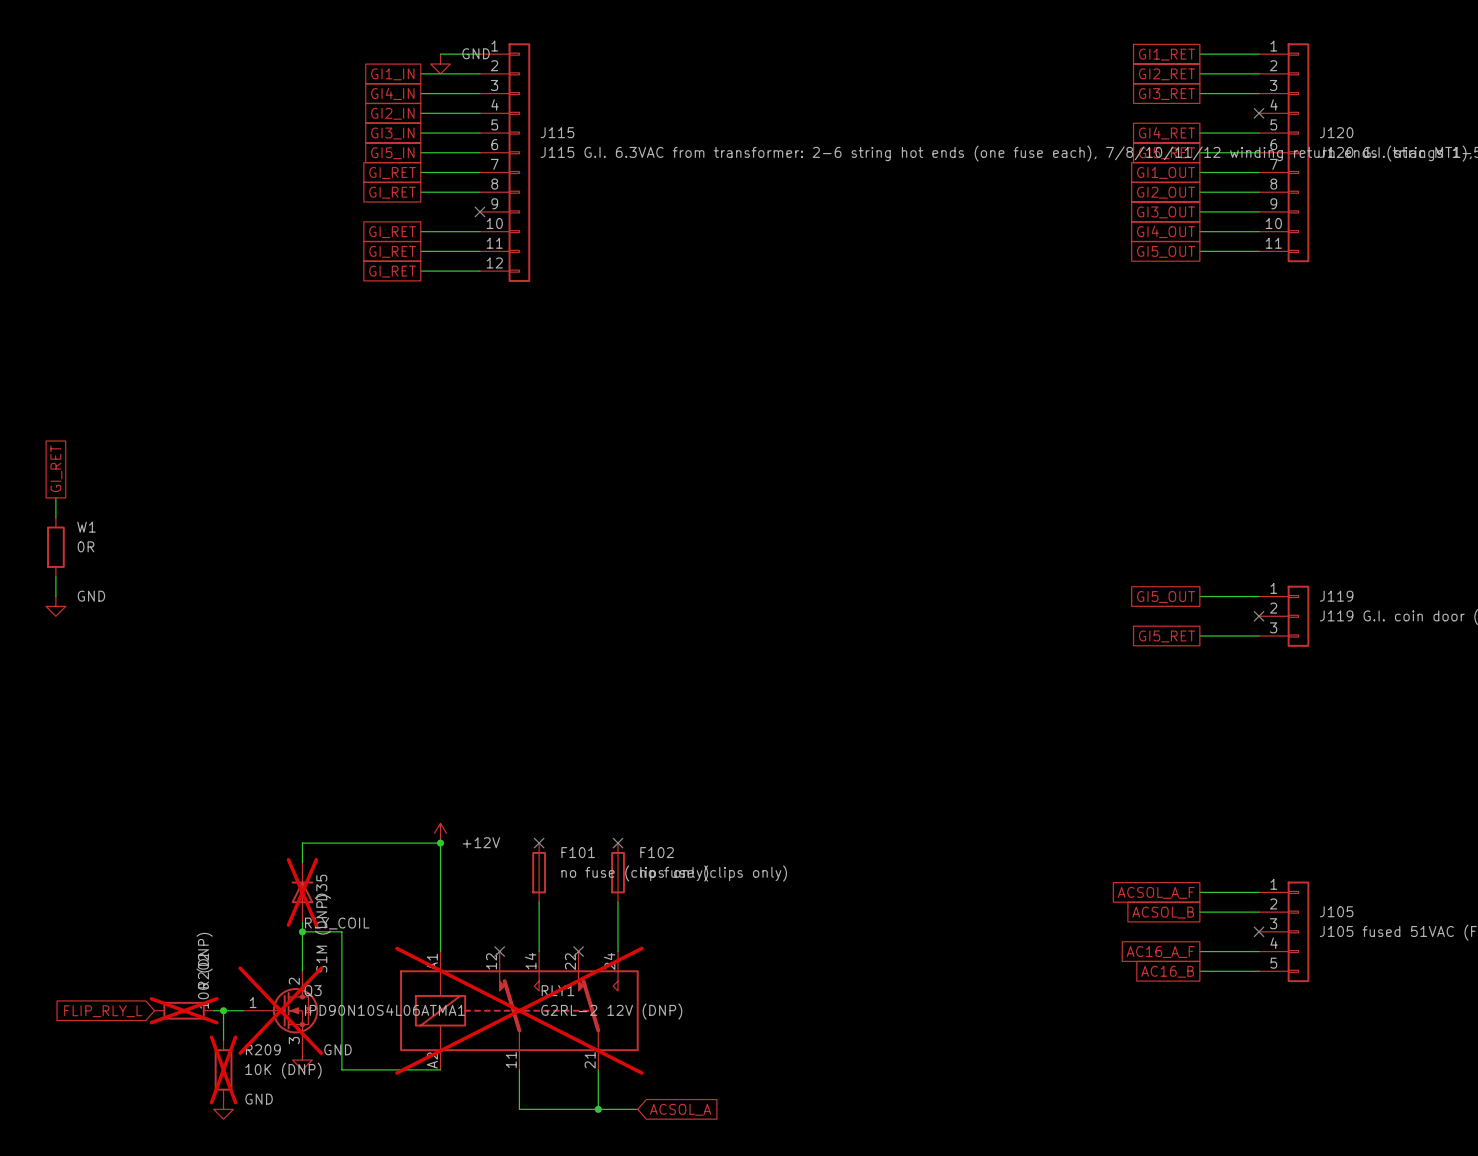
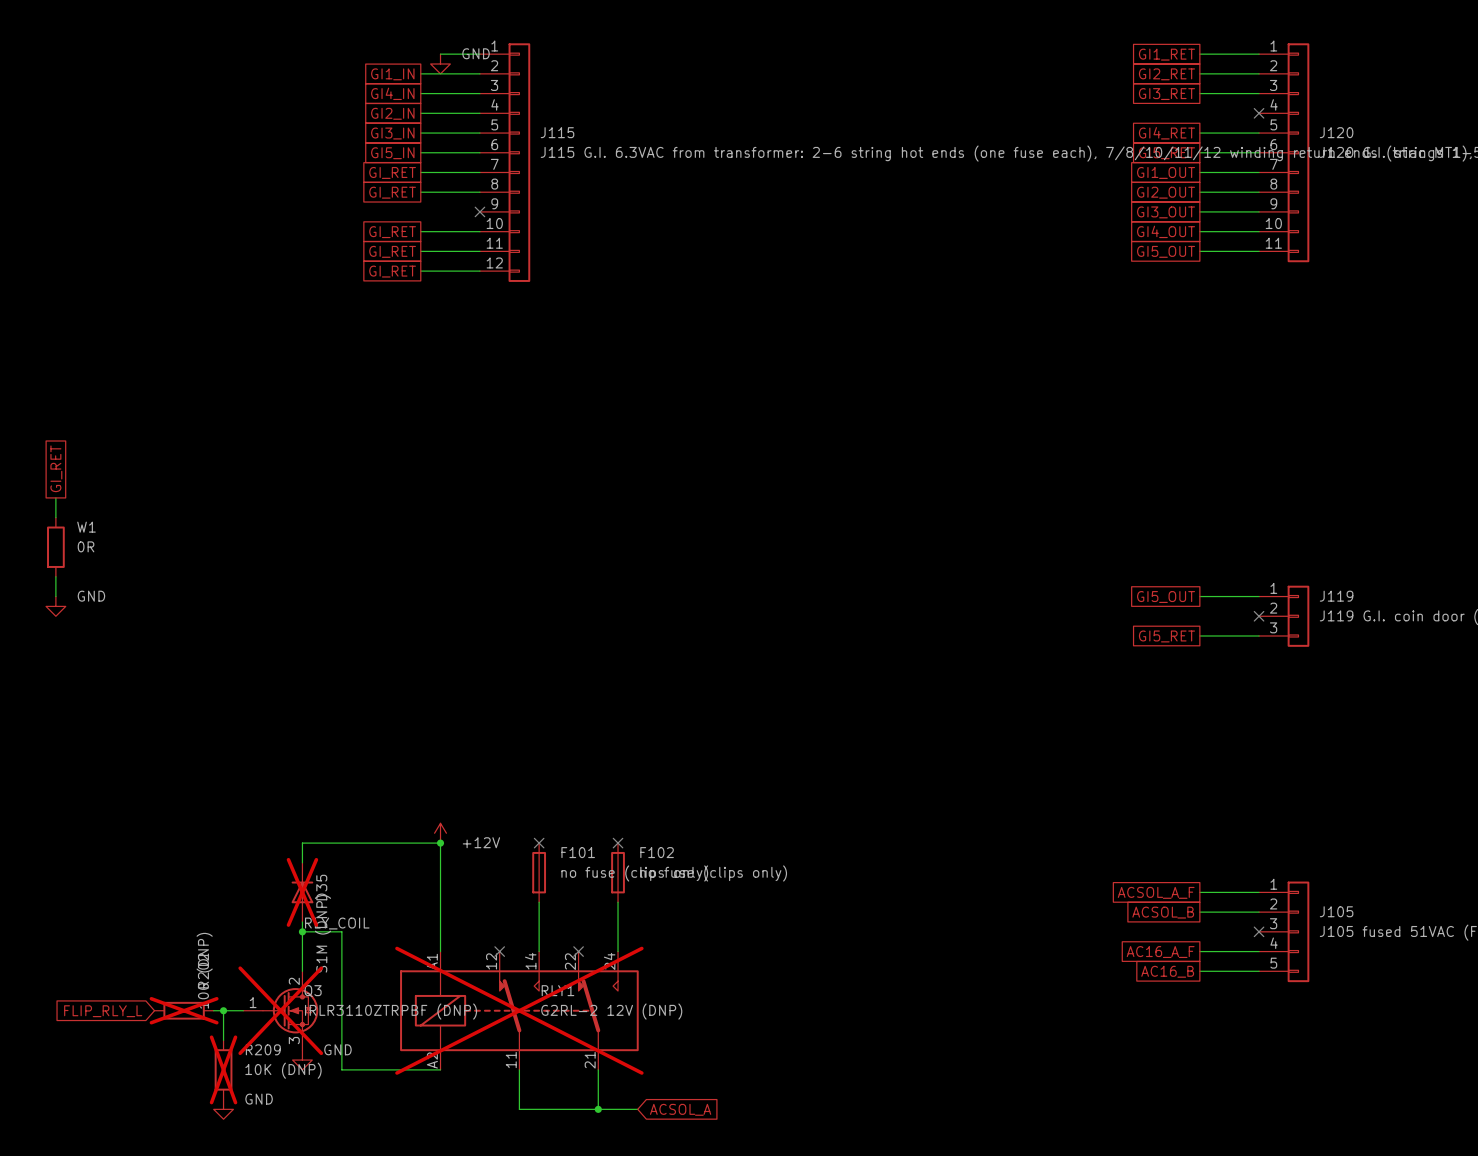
Q3 value: IPD90N10S4L06ATMA1 (384, 1010) -> IRLR3110ZTRPBF (DNP) (391, 1011)

